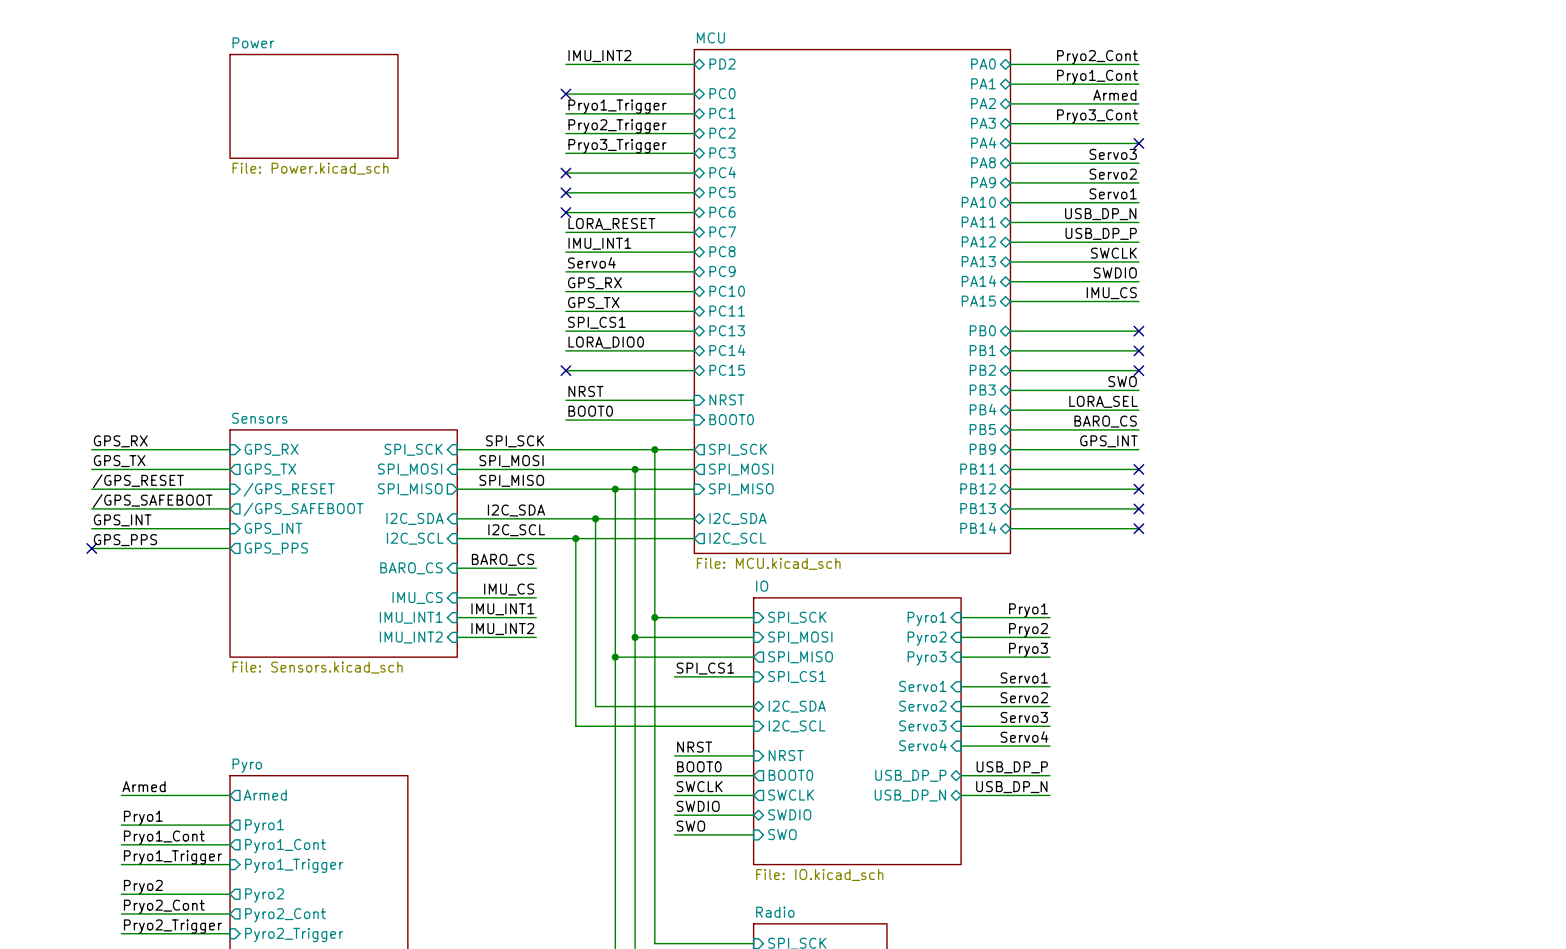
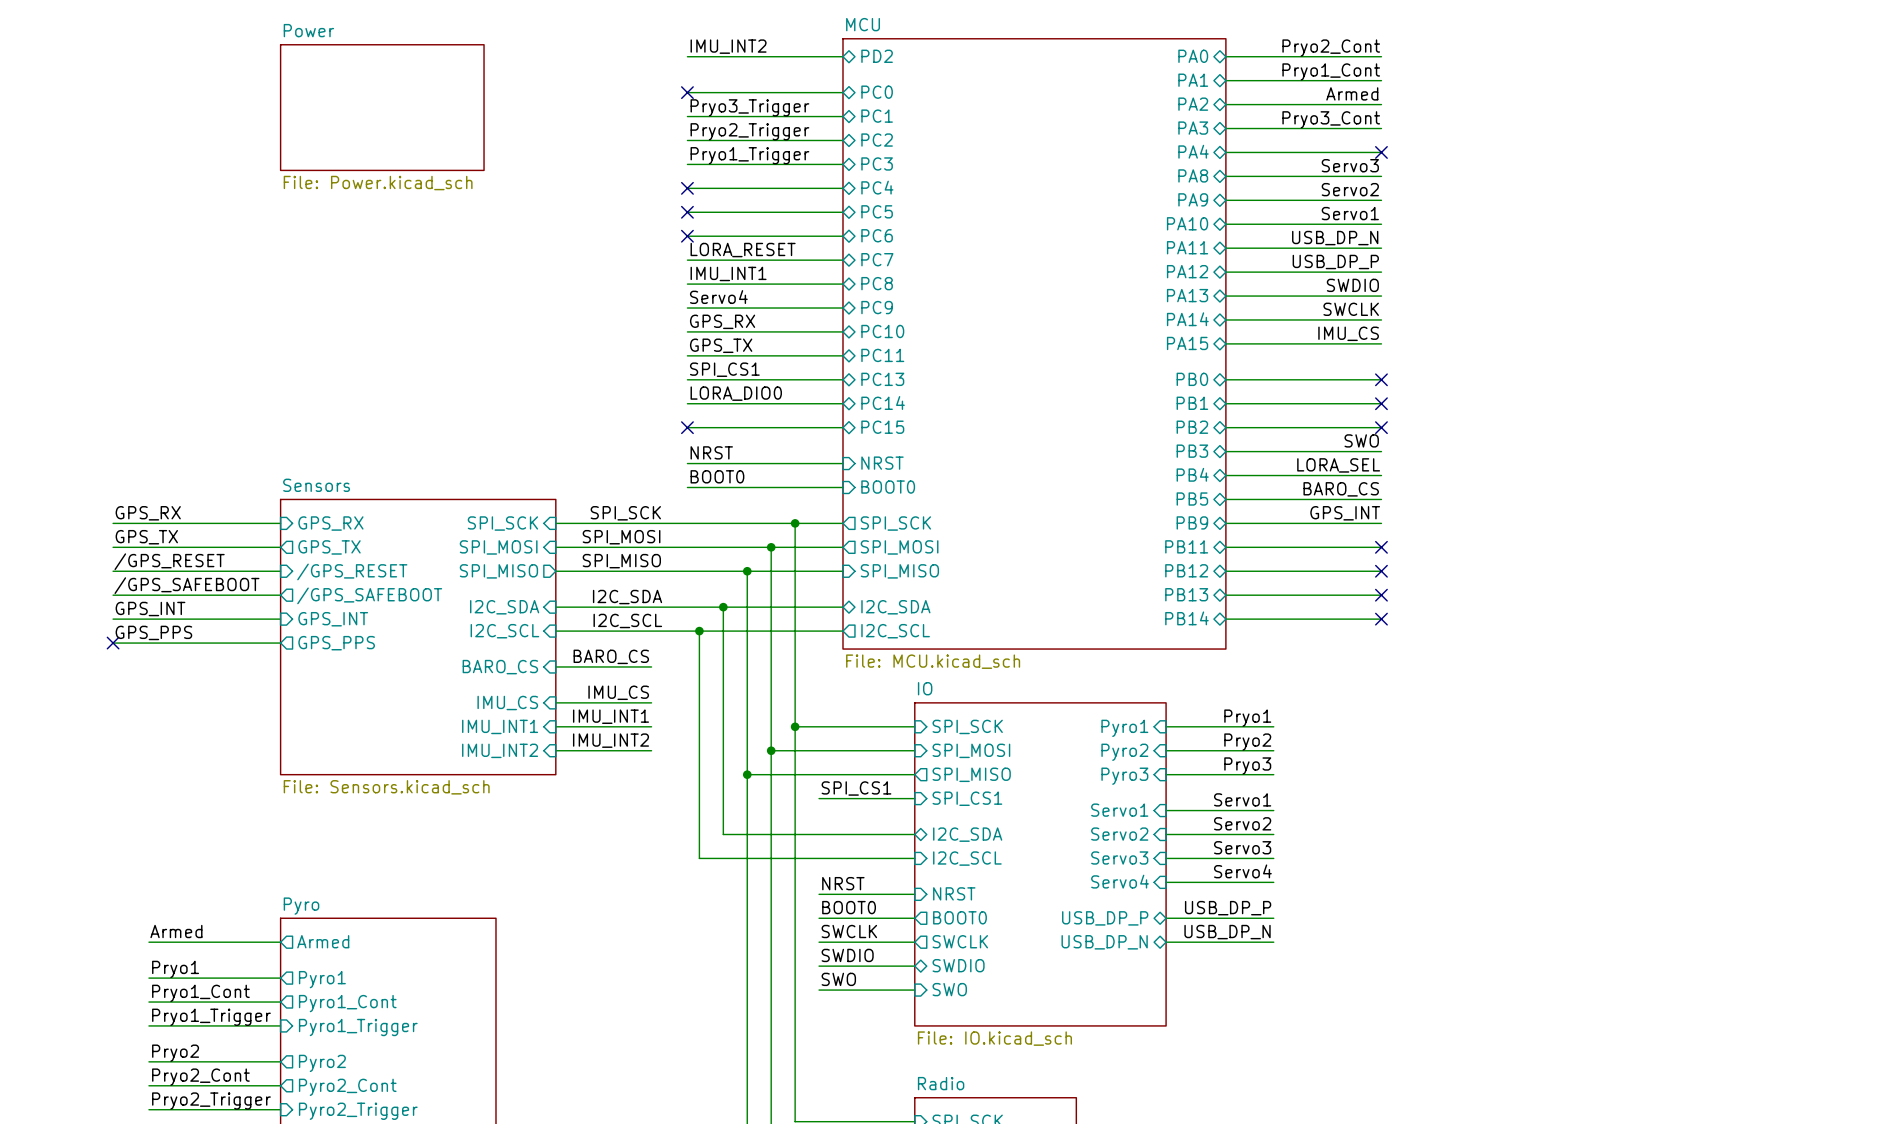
label: Pryo1_Trigger (617, 106) -> Pryo3_Trigger (749, 107)
label: Pryo3_Trigger (617, 146) -> Pryo1_Trigger (749, 155)
label: SWCLK (1113, 253) -> SWDIO (1352, 285)
label: SWDIO (1115, 272) -> SWCLK (1351, 309)

